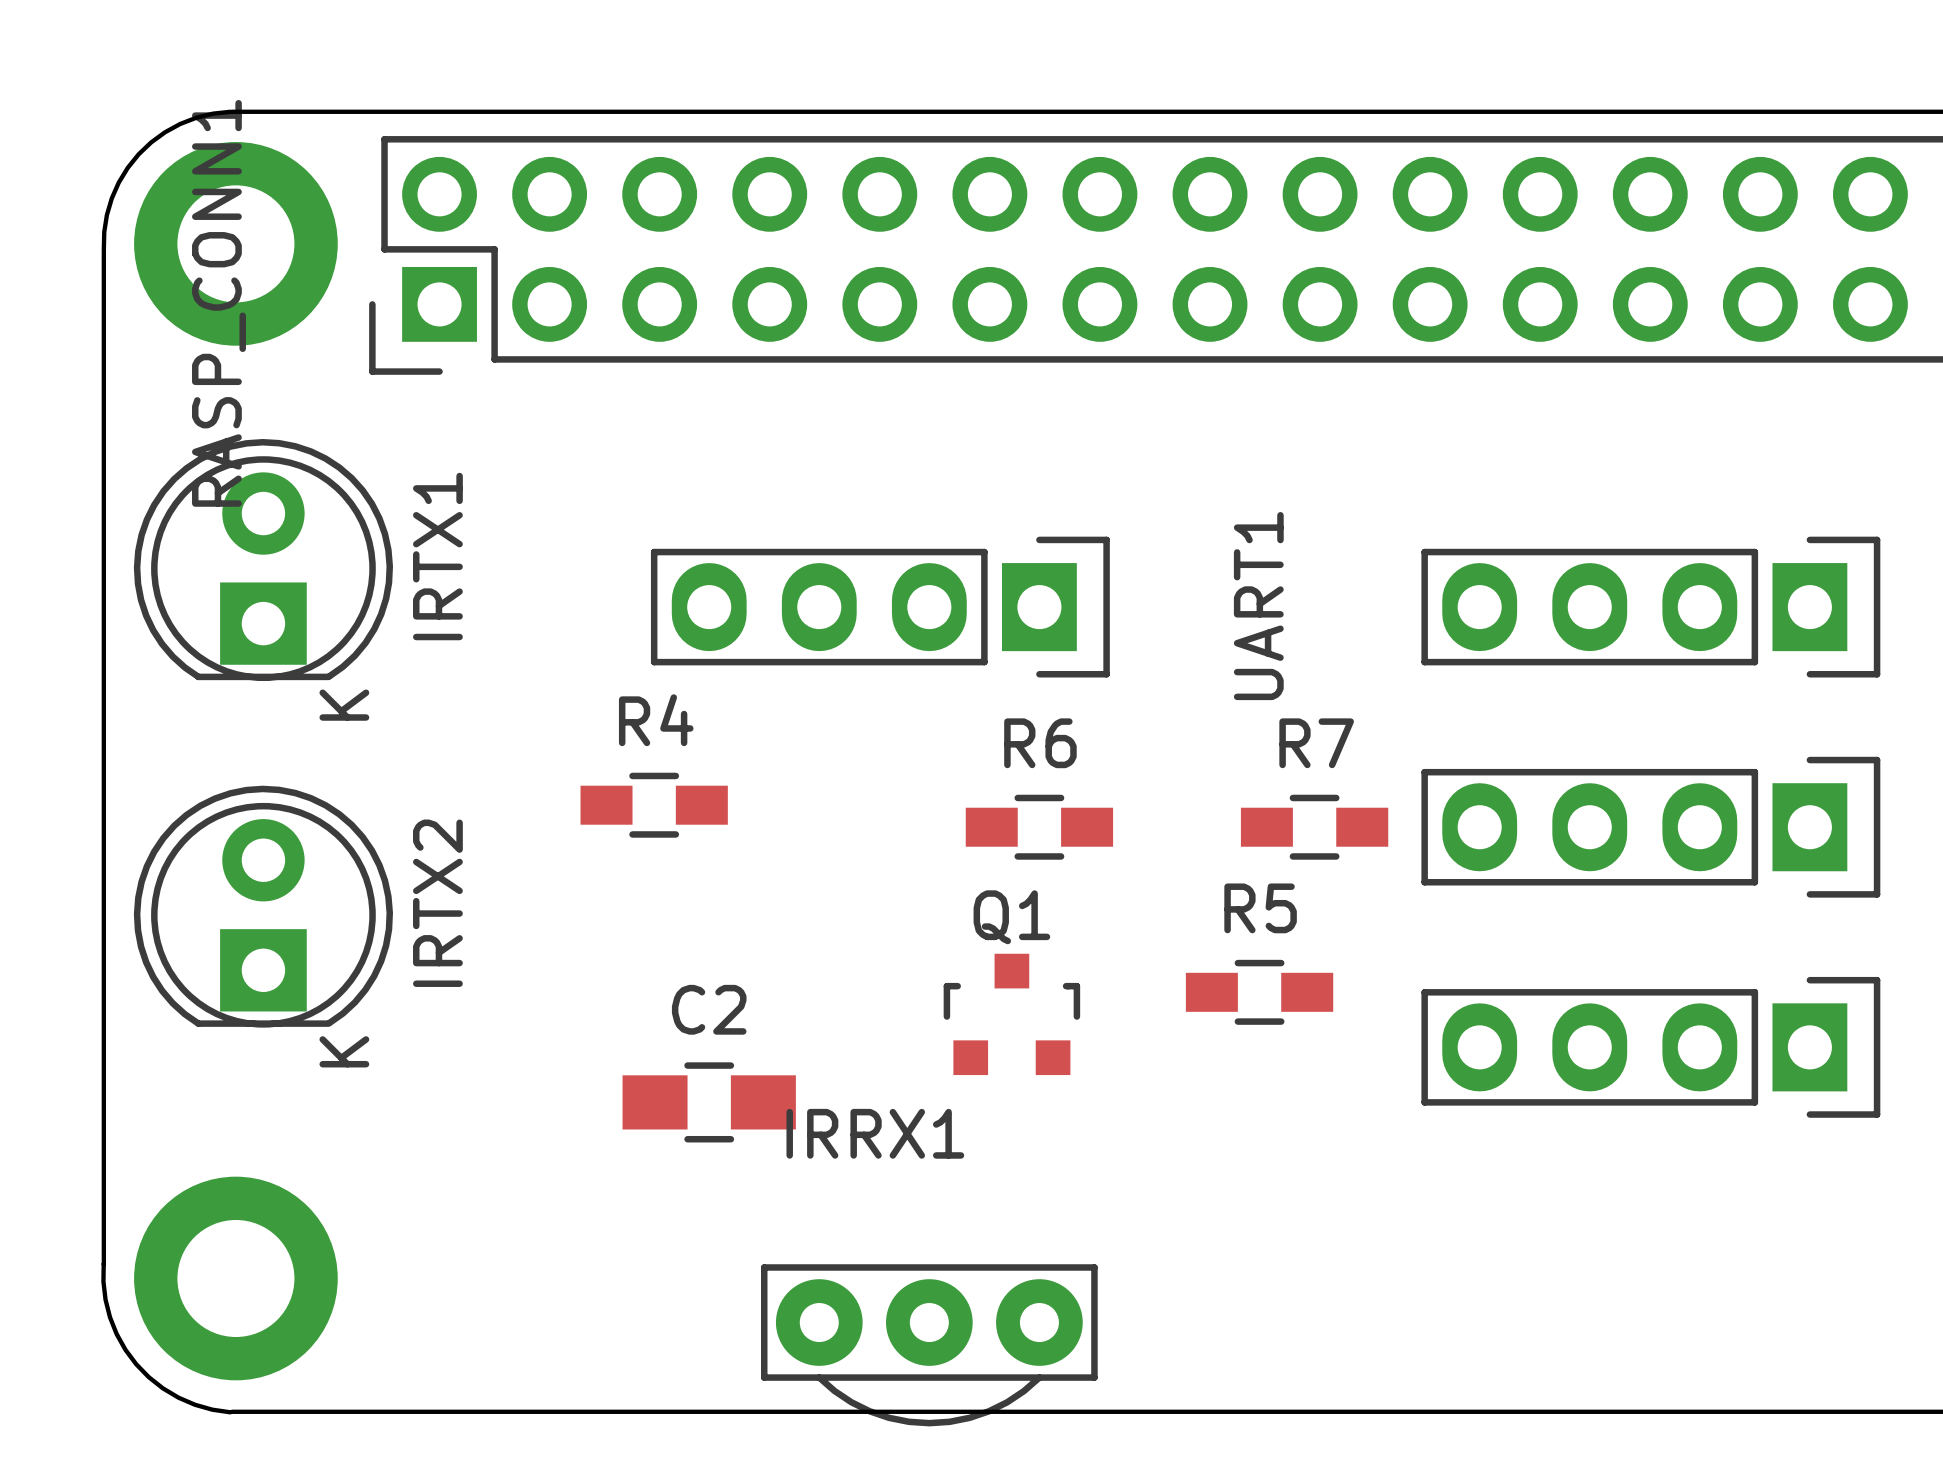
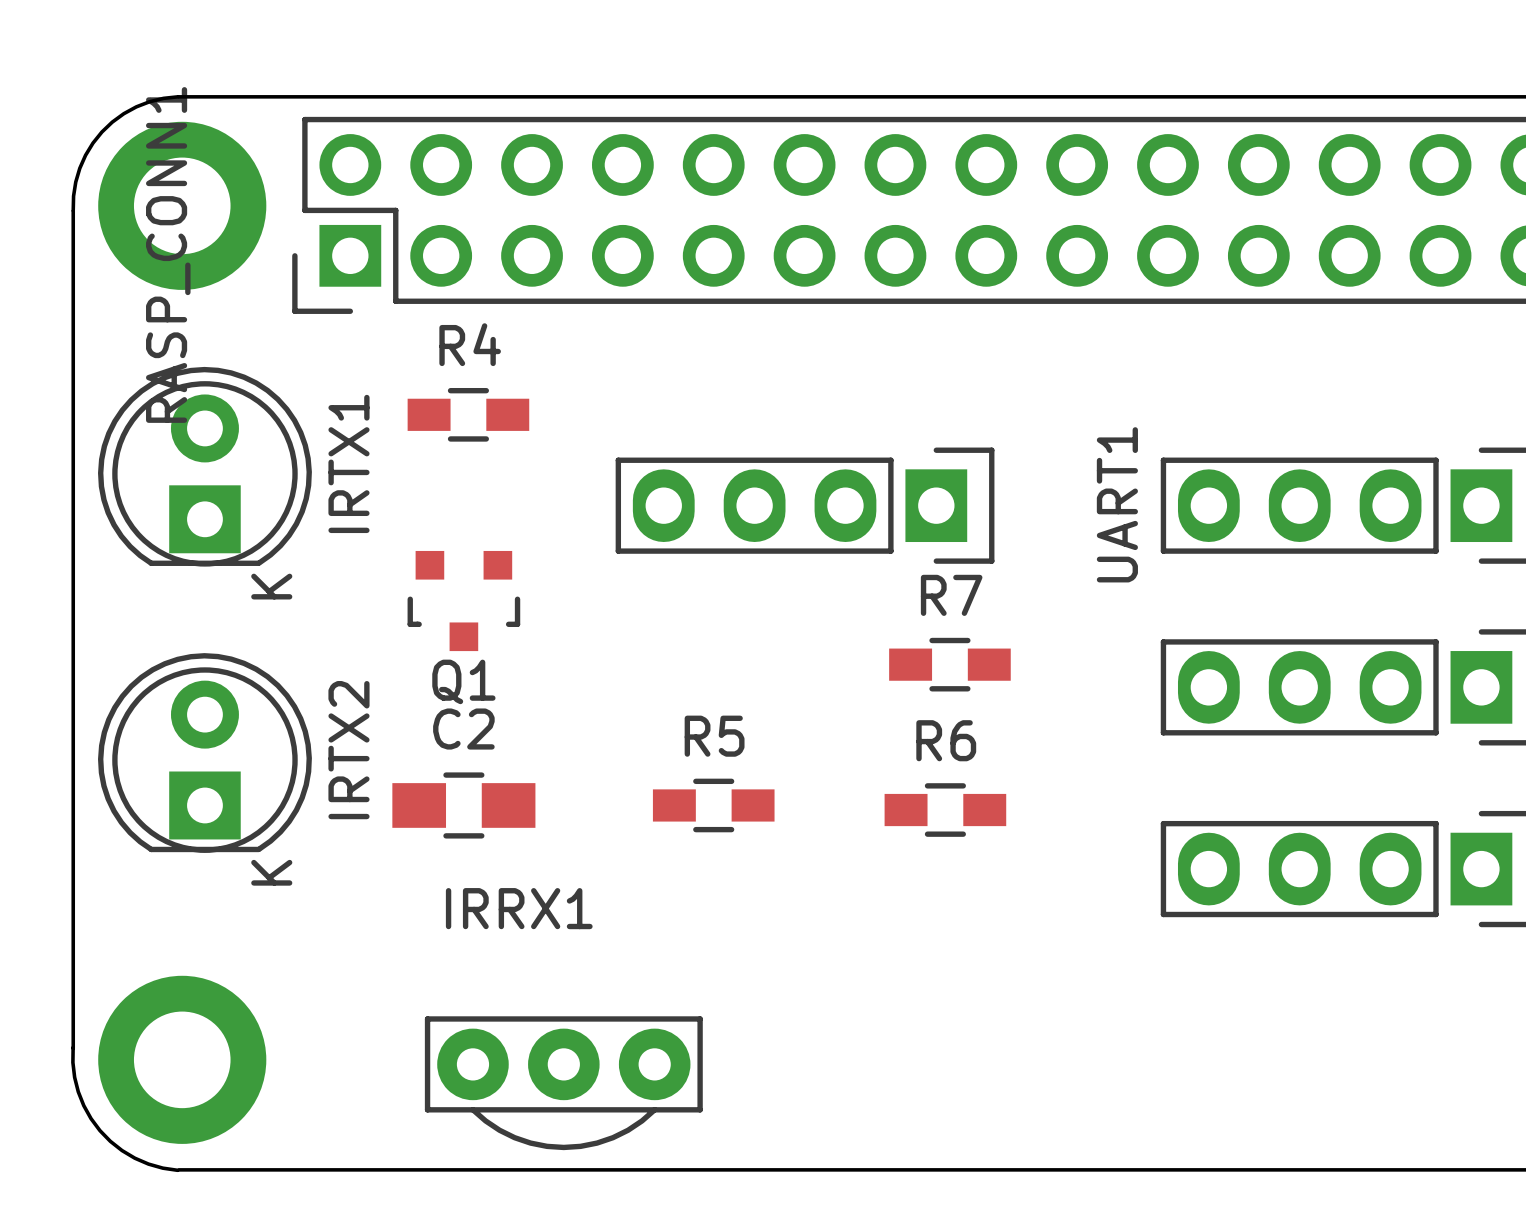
UART1 position: (880, 607) -> (805, 505)
R4 position: (654, 805) -> (468, 414)
R6 position: (1039, 827) -> (945, 810)
R7 position: (1314, 827) -> (949, 664)
R5 position: (1259, 992) -> (713, 805)
Q1 rotation: 0° (1011, 1014) -> 180° (463, 601)
Q1 position: (1011, 1014) -> (463, 601)
C2 position: (709, 1102) -> (463, 805)
IRRX1 position: (929, 1345) -> (563, 1083)

